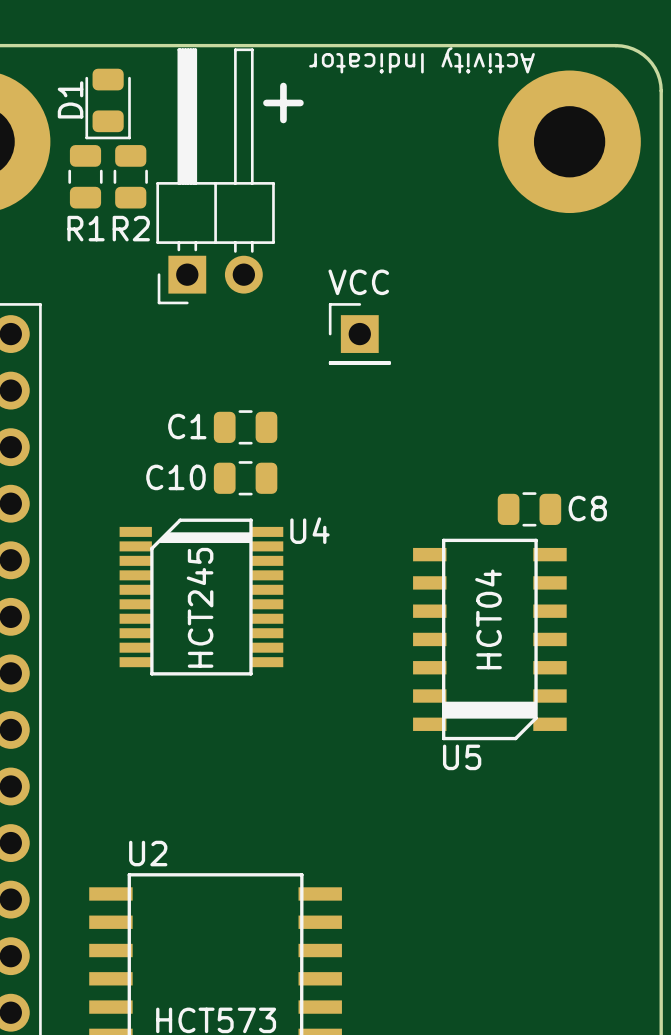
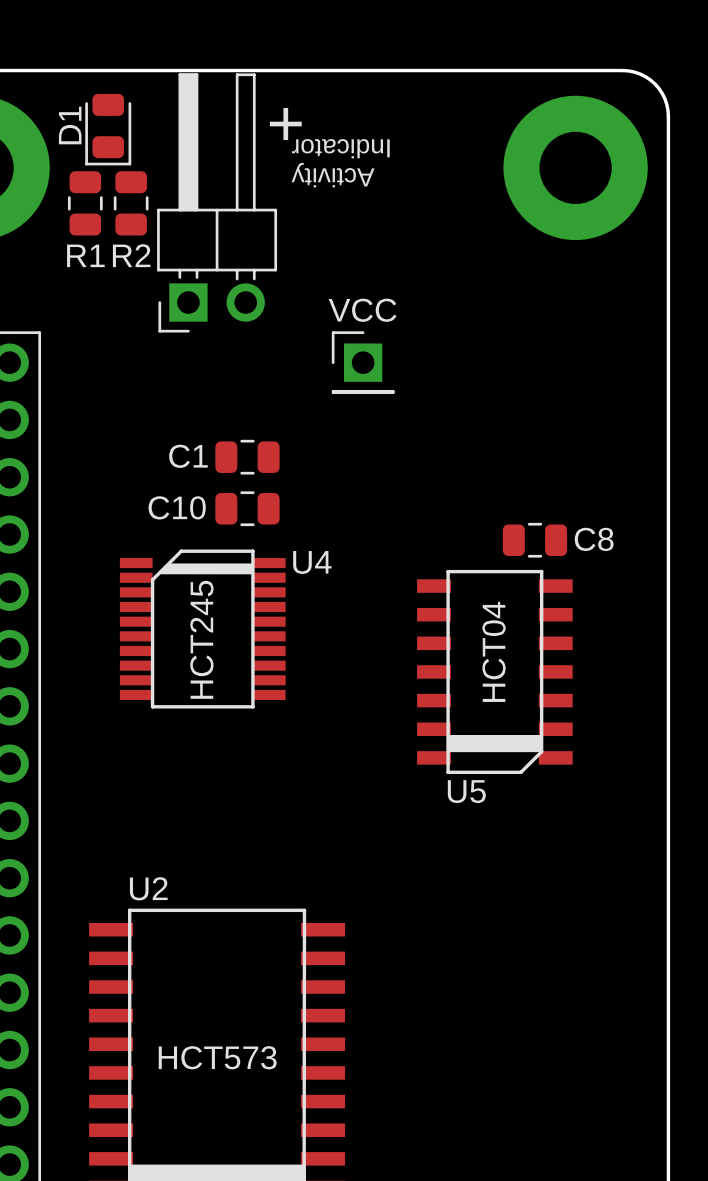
text: Activity Indicator (422, 60) -> none
text: none -> Indicator (340, 148)
text: none -> Activity (333, 175)

